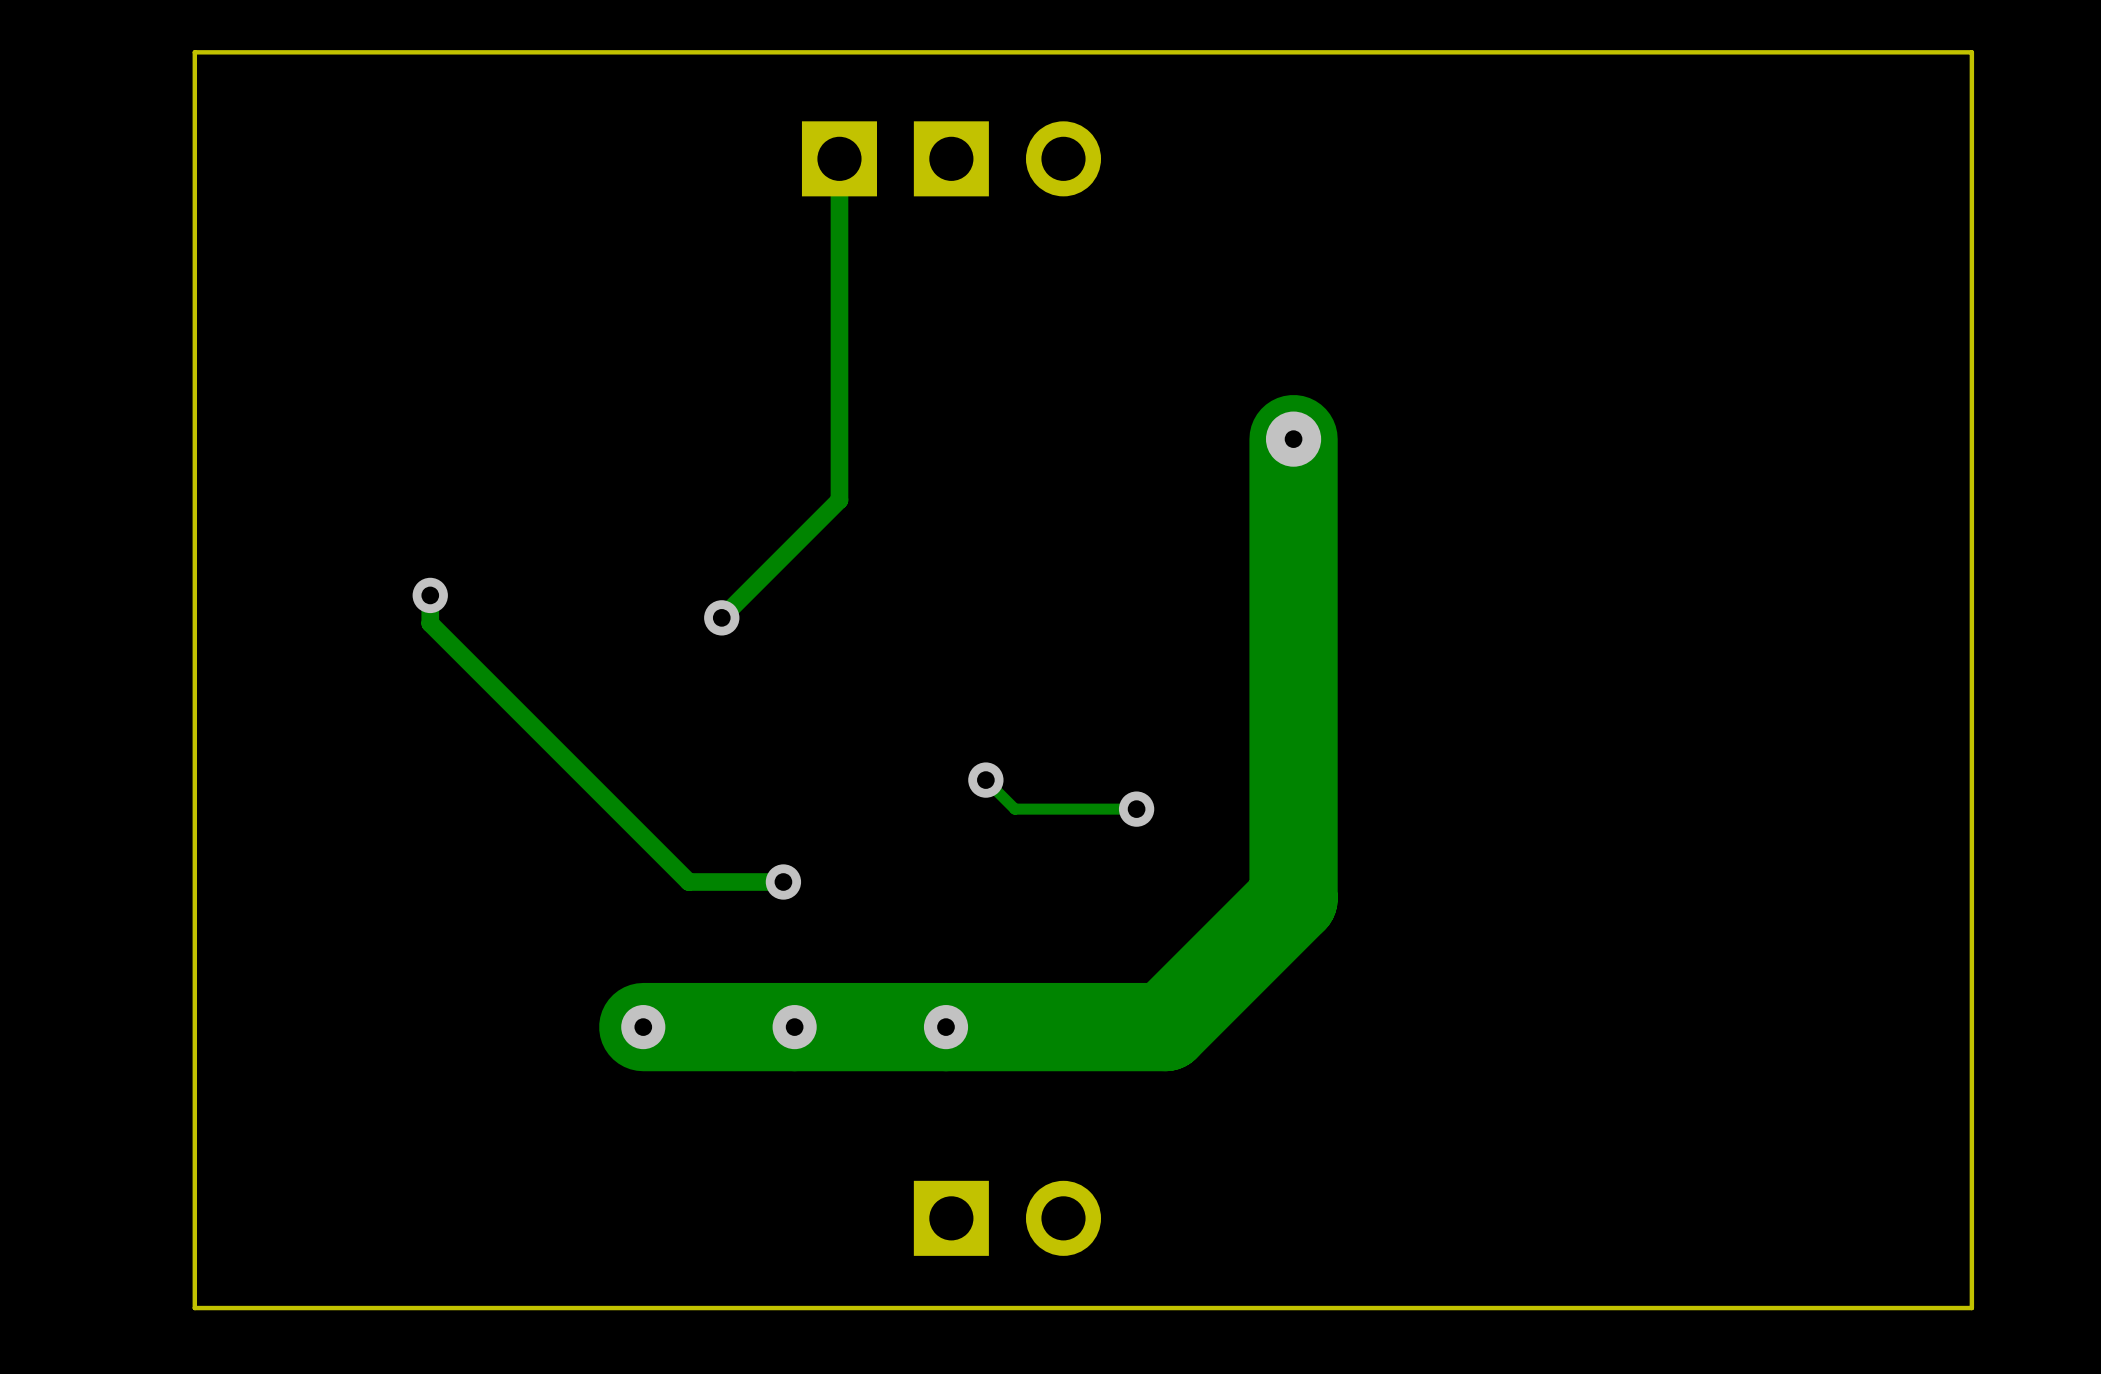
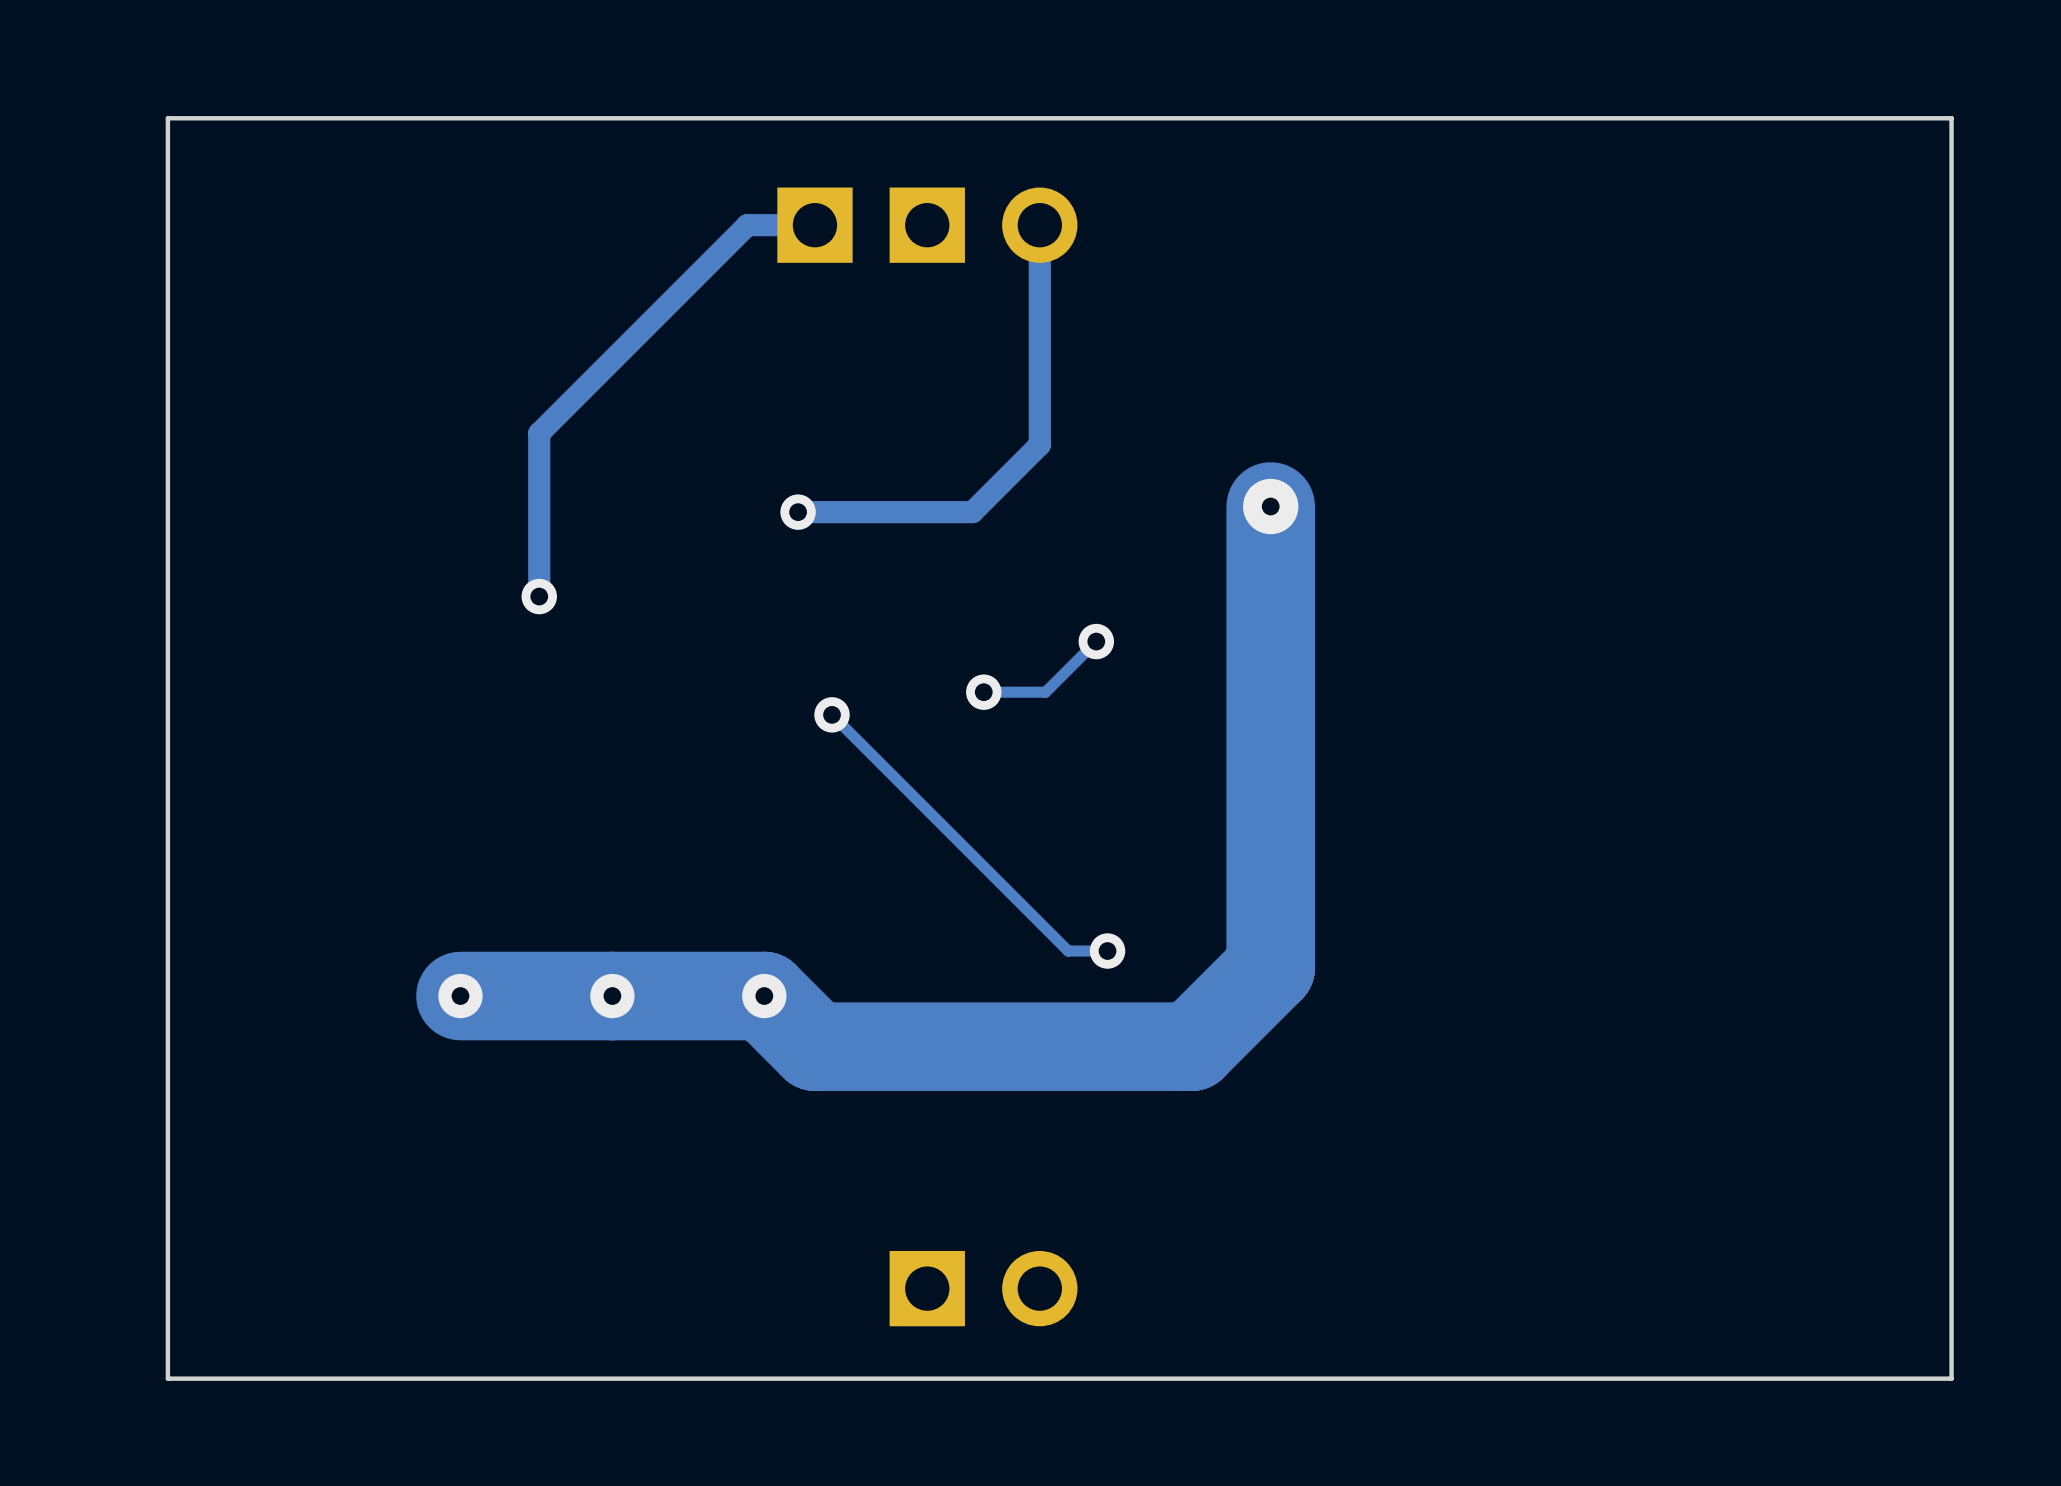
track: (839, 158) (839, 500) (721, 617) -> (814, 225) (747, 225) (539, 433) (539, 596)
track: none -> (1039, 225) (1039, 444) (972, 512) (798, 512)
via: none -> (798, 512)
via: none -> (539, 596)
track: none -> (1096, 641) (1045, 692) (983, 692)
via: none -> (1096, 641)
track: (430, 595) (430, 623) (688, 882) (783, 882) -> none
via: (430, 595) -> none
via: (721, 617) -> none
via: none -> (983, 692)
track: none -> (832, 714) (1068, 951) (1107, 951)
via: none -> (832, 714)
track: (985, 780) (1014, 809) (1136, 809) -> none
via: (985, 780) -> none
via position: (1136, 809) -> (1107, 951)
via: (783, 882) -> none
via: none -> (460, 996)
via: none -> (612, 996)
via: none -> (764, 996)
track: (1215, 977) (1165, 1027) (643, 1027) -> (1191, 1046) (814, 1046) (764, 996) (460, 996)
via: (643, 1027) -> none
via: (794, 1027) -> none
via: (946, 1027) -> none

